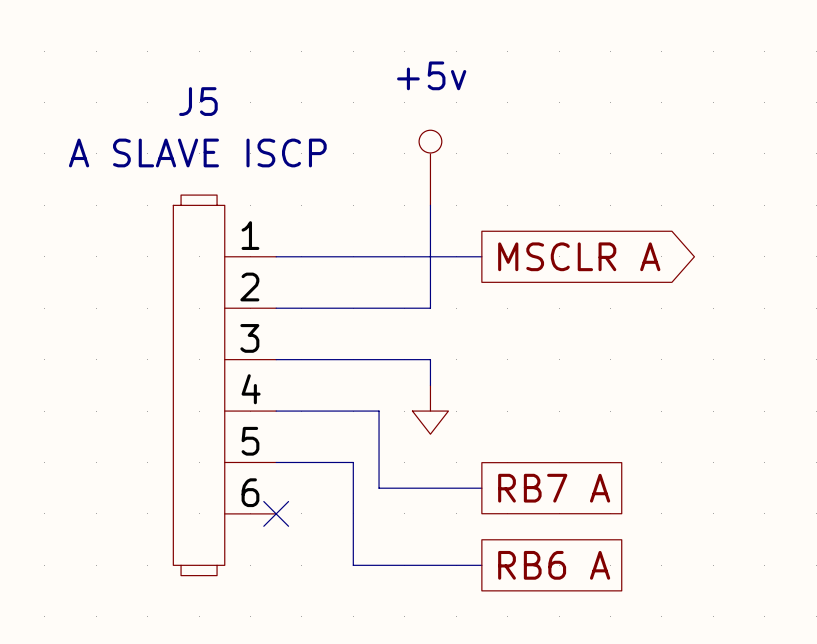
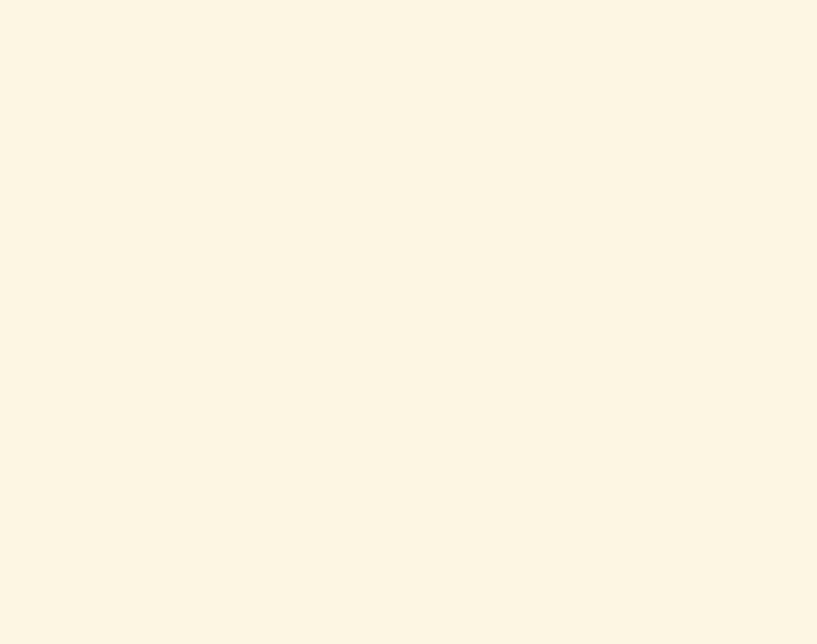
power symbol: +5v (430, 167) -> none
wire: (430, 205) (430, 308) (276, 308) -> none
wire: (276, 256) (481, 256) -> none
global label: MSCLR A (579, 256) -> none
wire: (276, 359) (430, 359) (430, 385) -> none
J5: A SLAVE ISCP (224, 385) -> none
power symbol: (430, 409) -> none
wire: (276, 411) (379, 411) (379, 488) (481, 488) -> none
wire: (276, 462) (353, 462) (353, 565) (481, 565) -> none
global label: RB7 A (554, 488) -> none
no-connect mark: (276, 513) -> none
global label: RB6 A (554, 565) -> none

